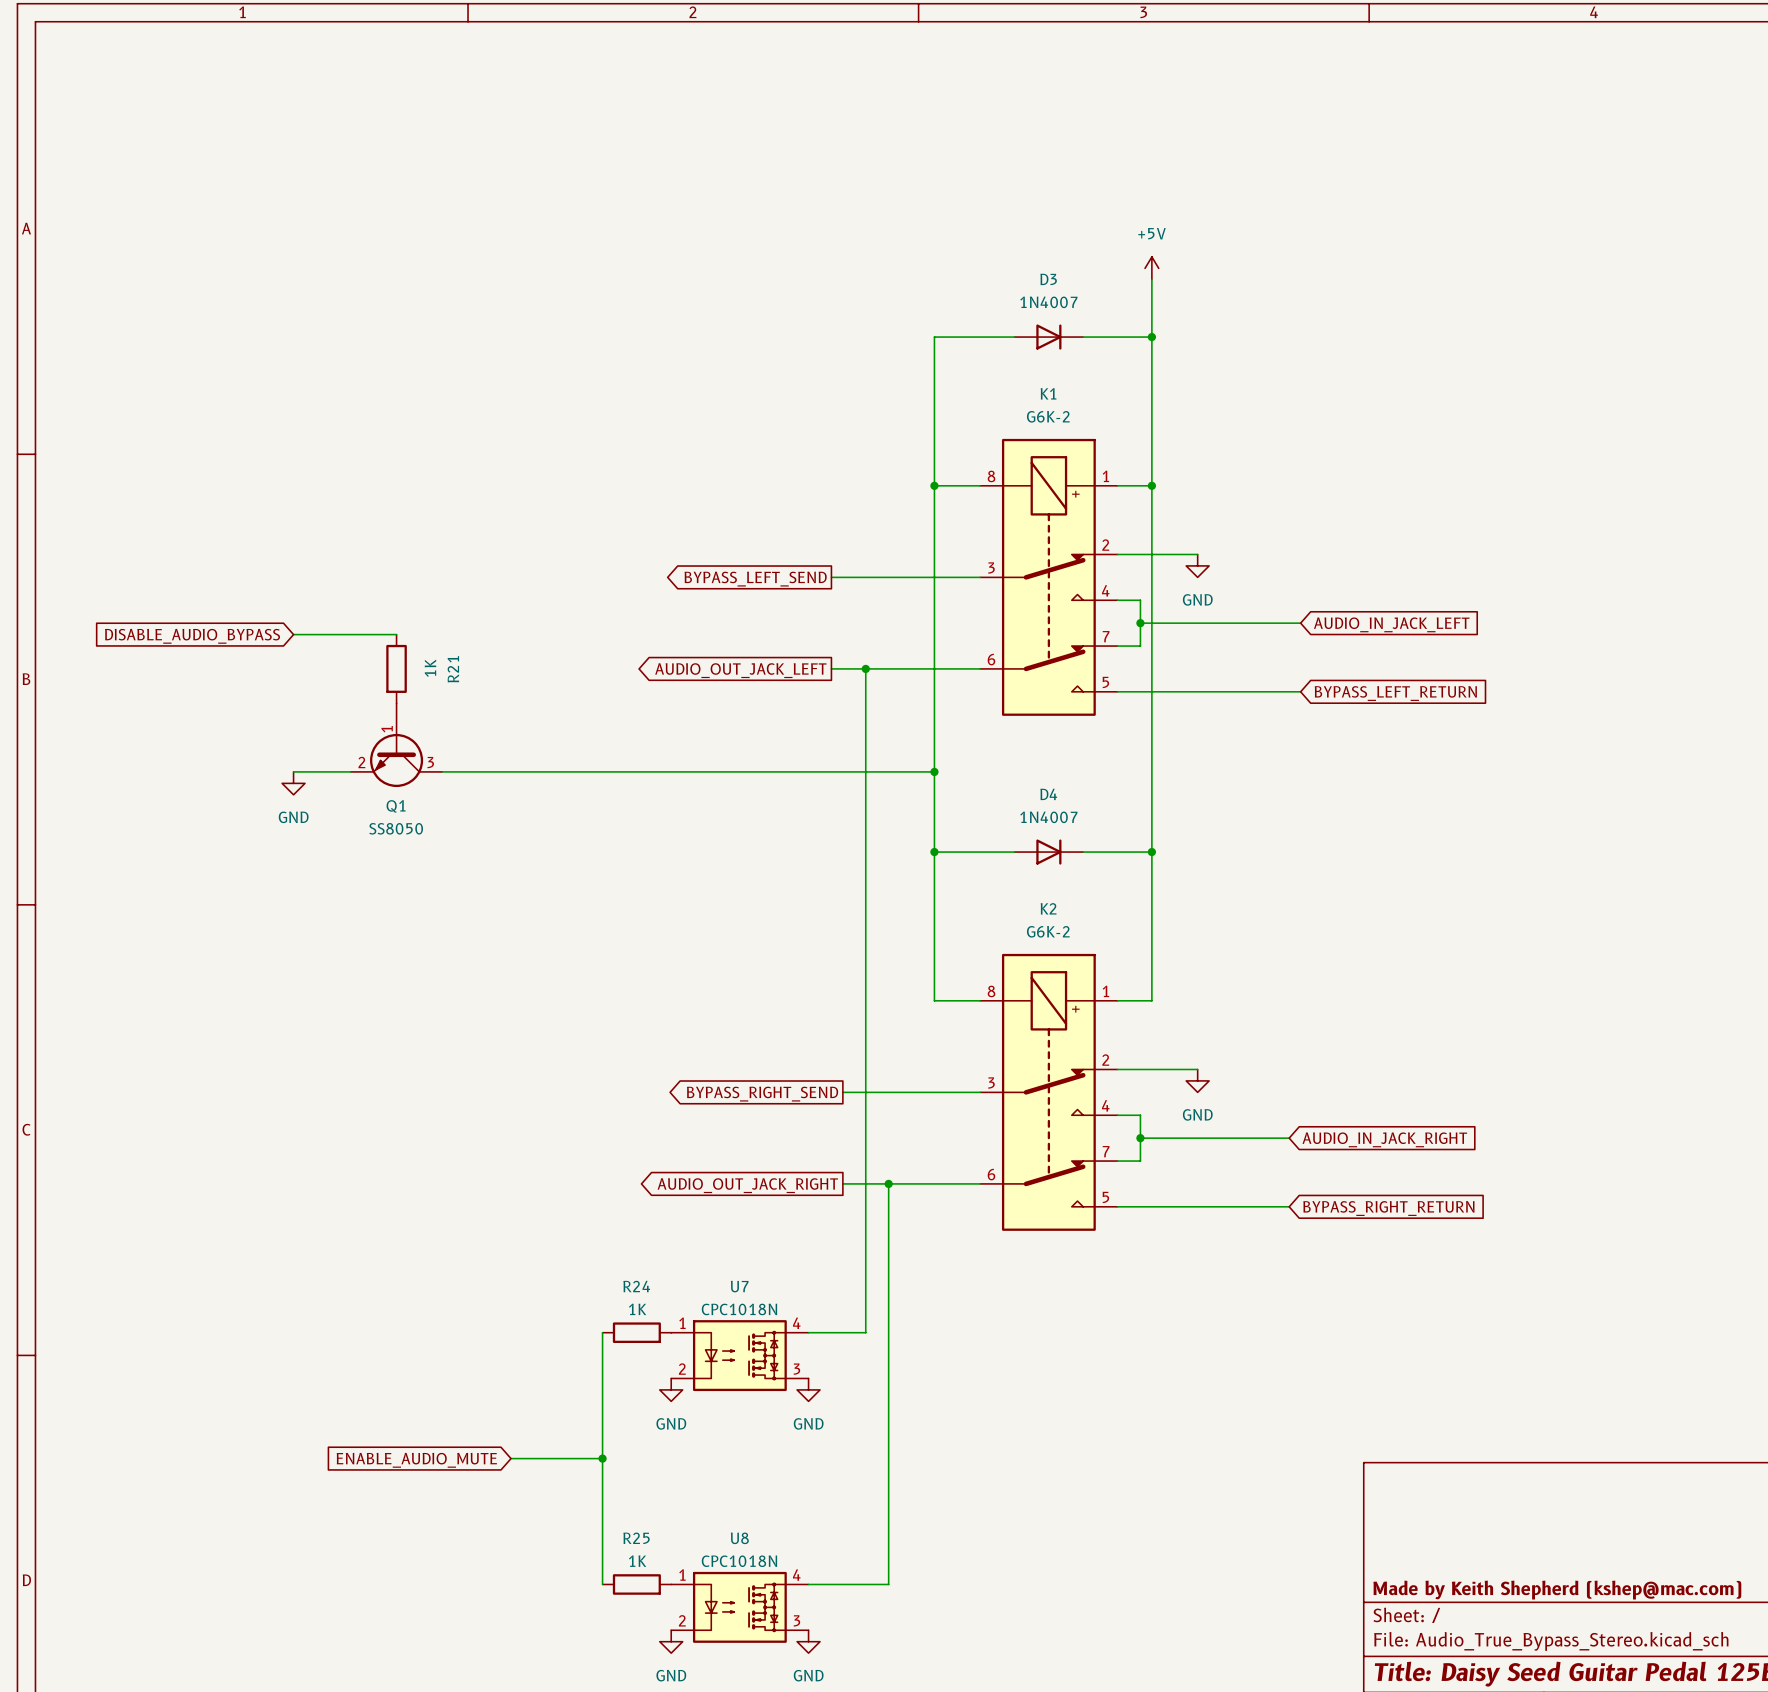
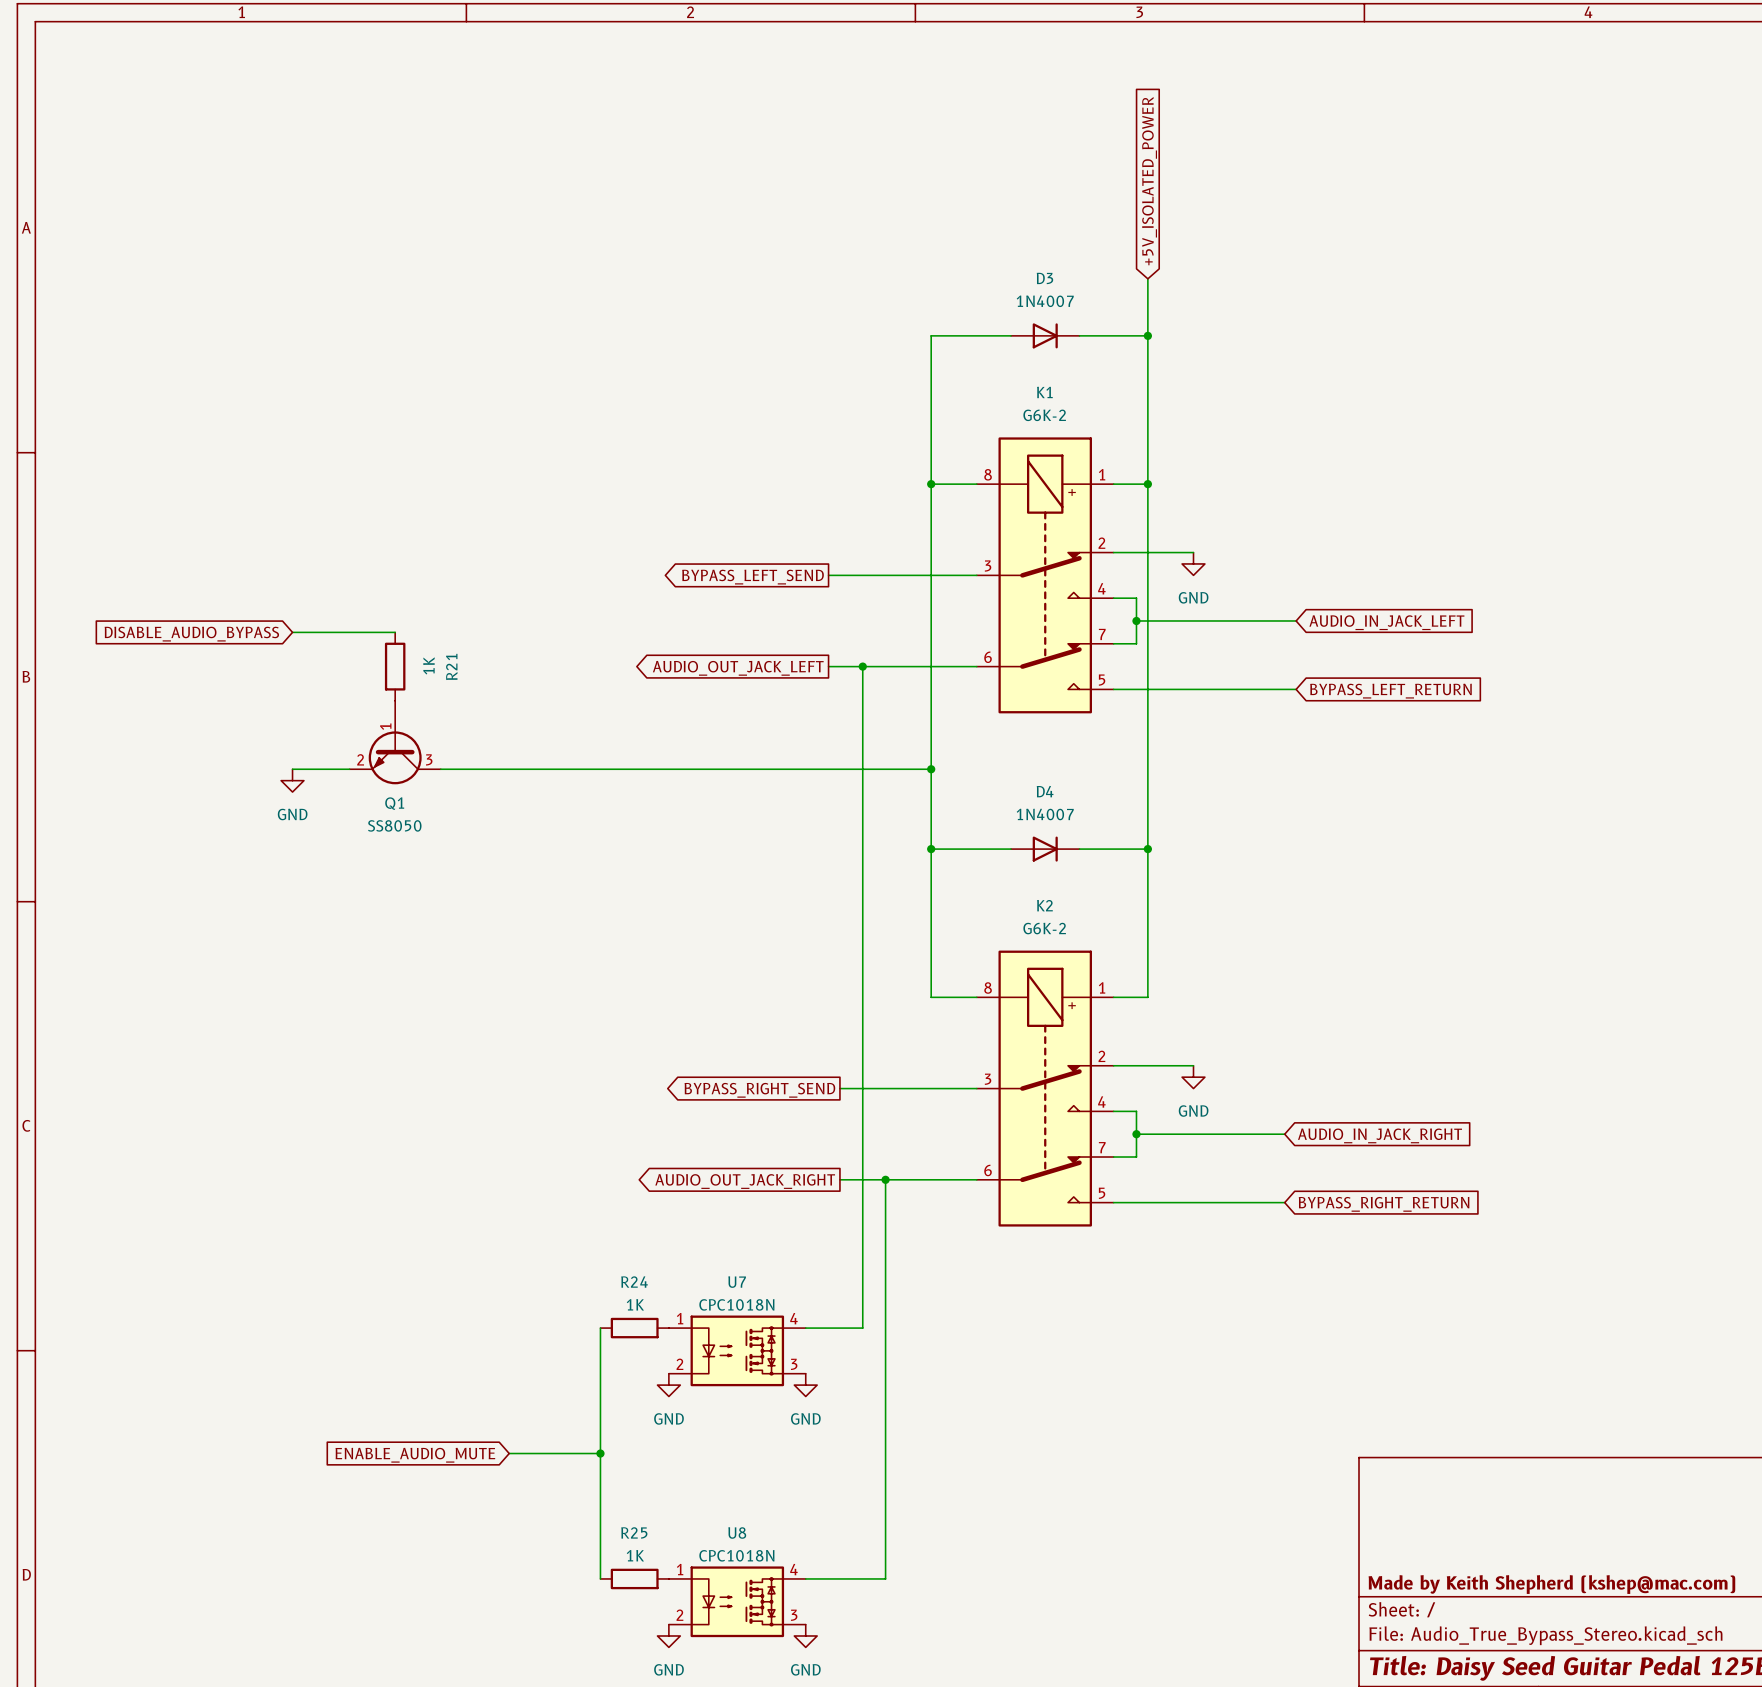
global label: none -> +5V_ISOLATED_POWER (1149, 181)
power symbol: +5V (1151, 268) -> none

